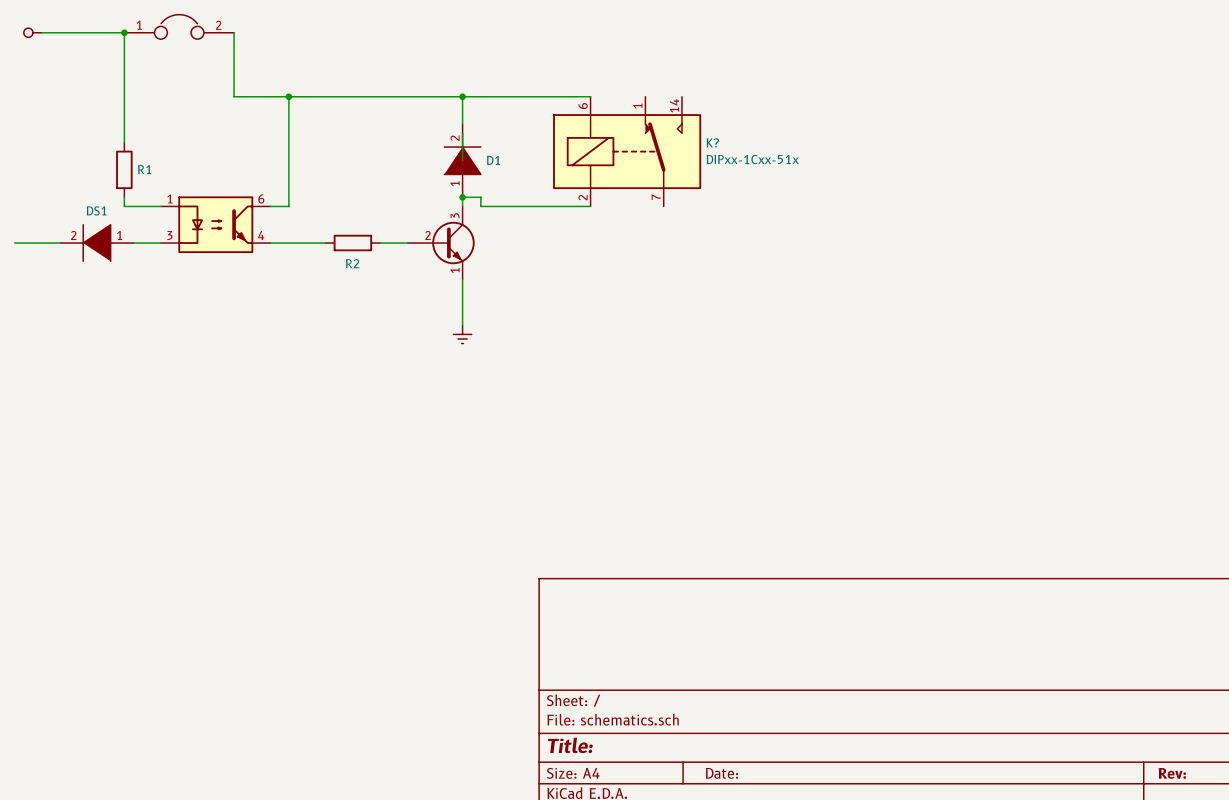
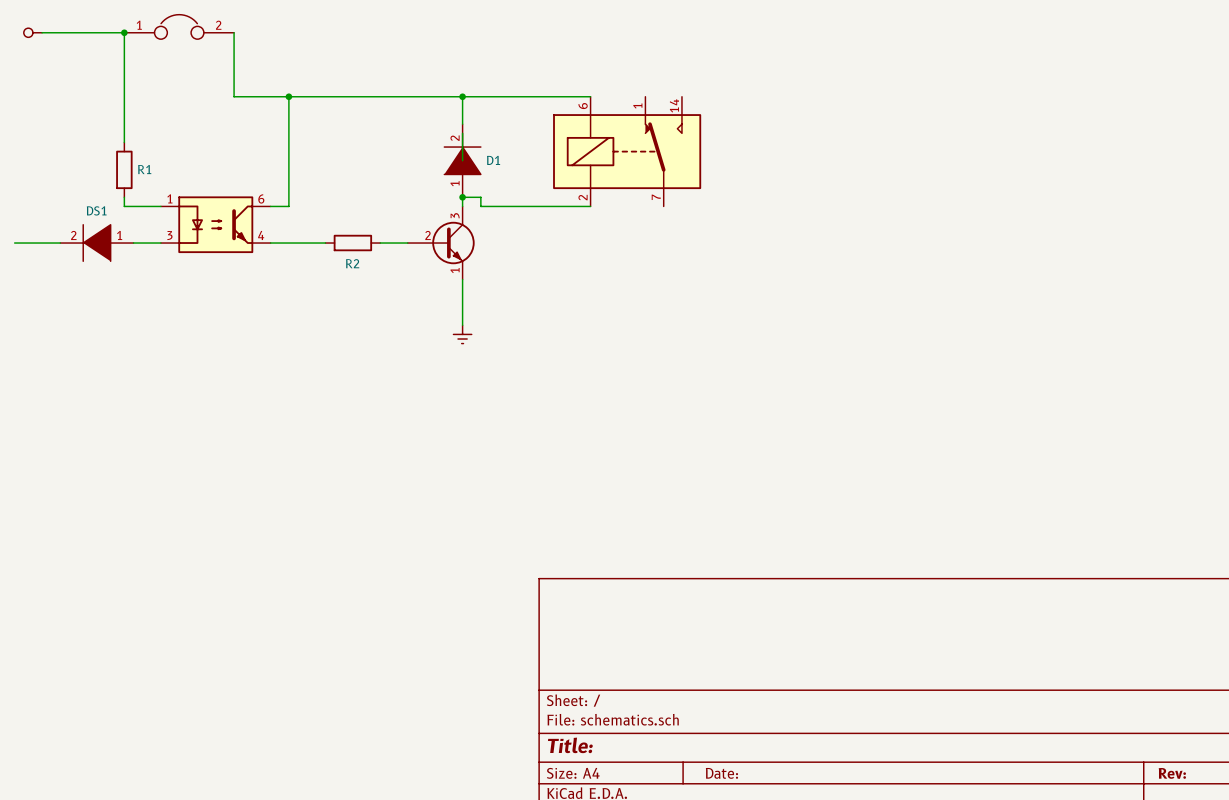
K? name: K? (712, 142) -> none
K? value: DIPxx-1Cxx-51x (752, 159) -> none

